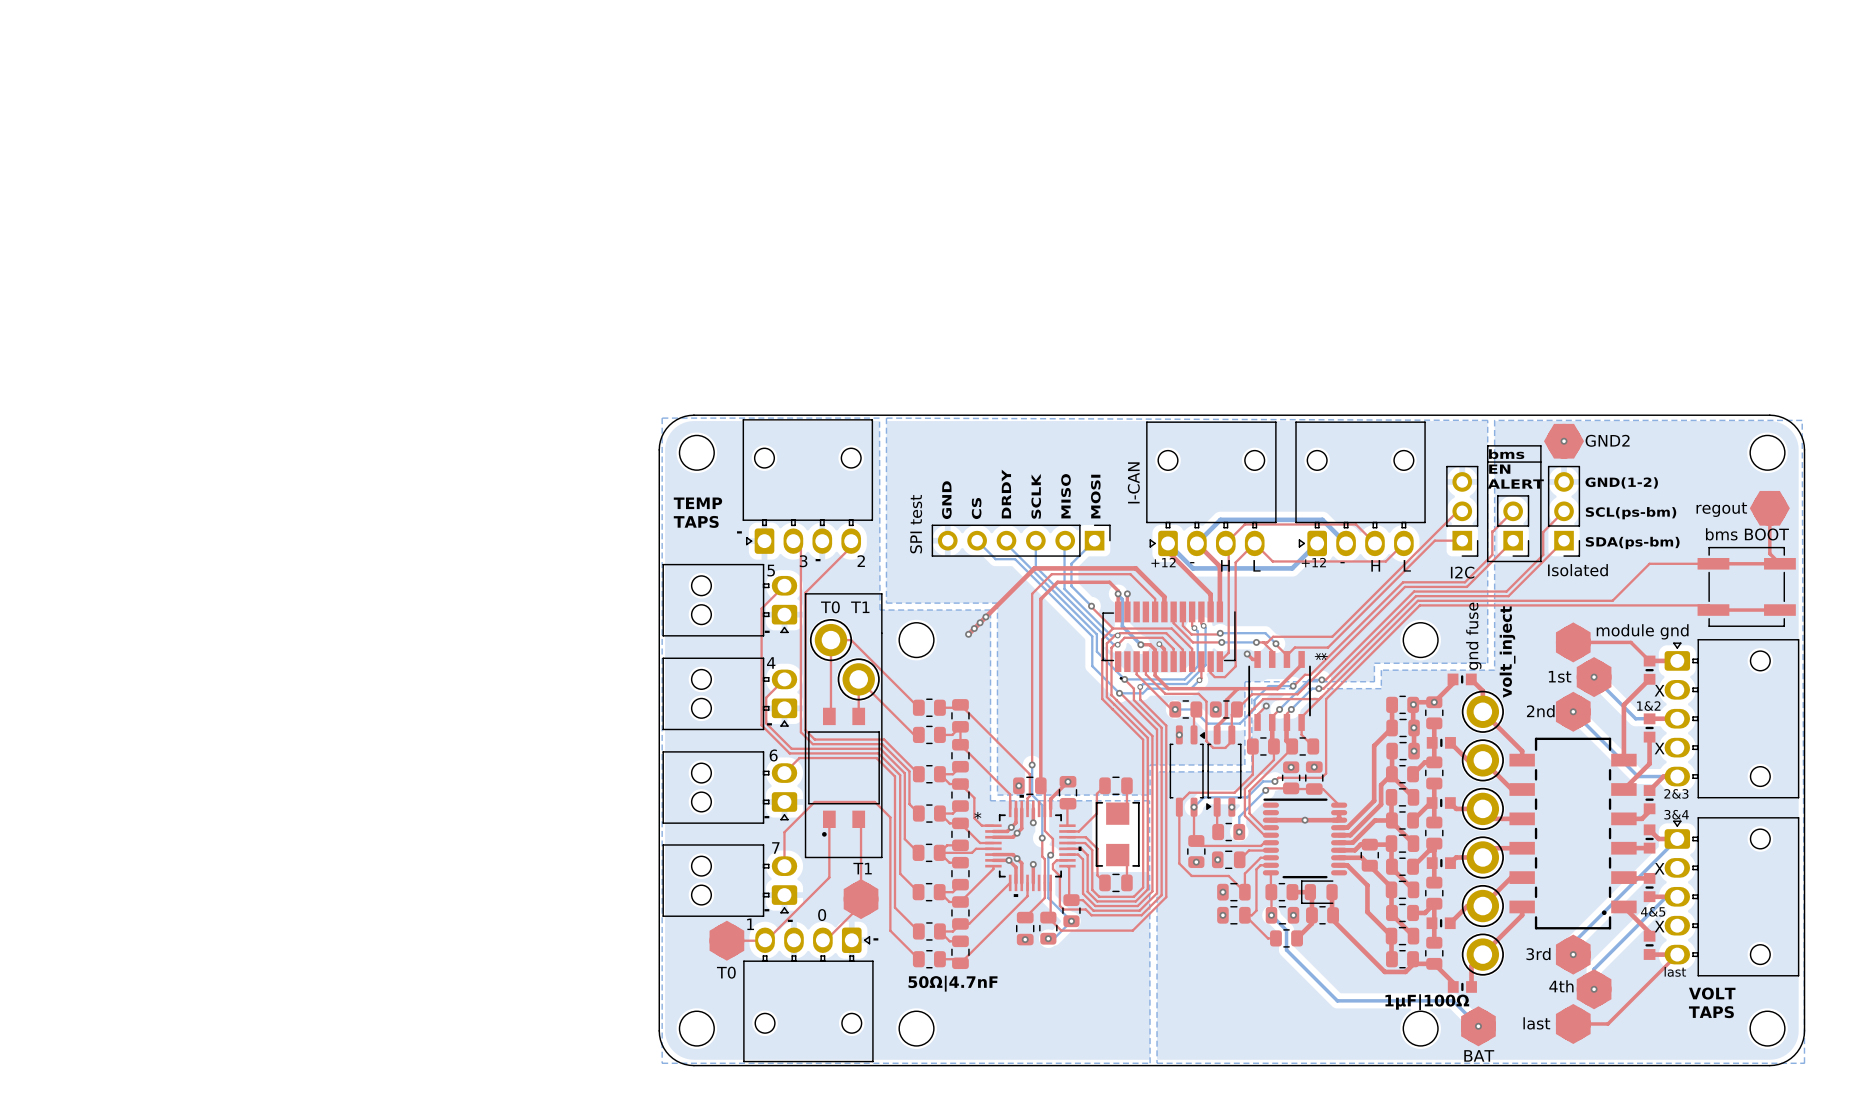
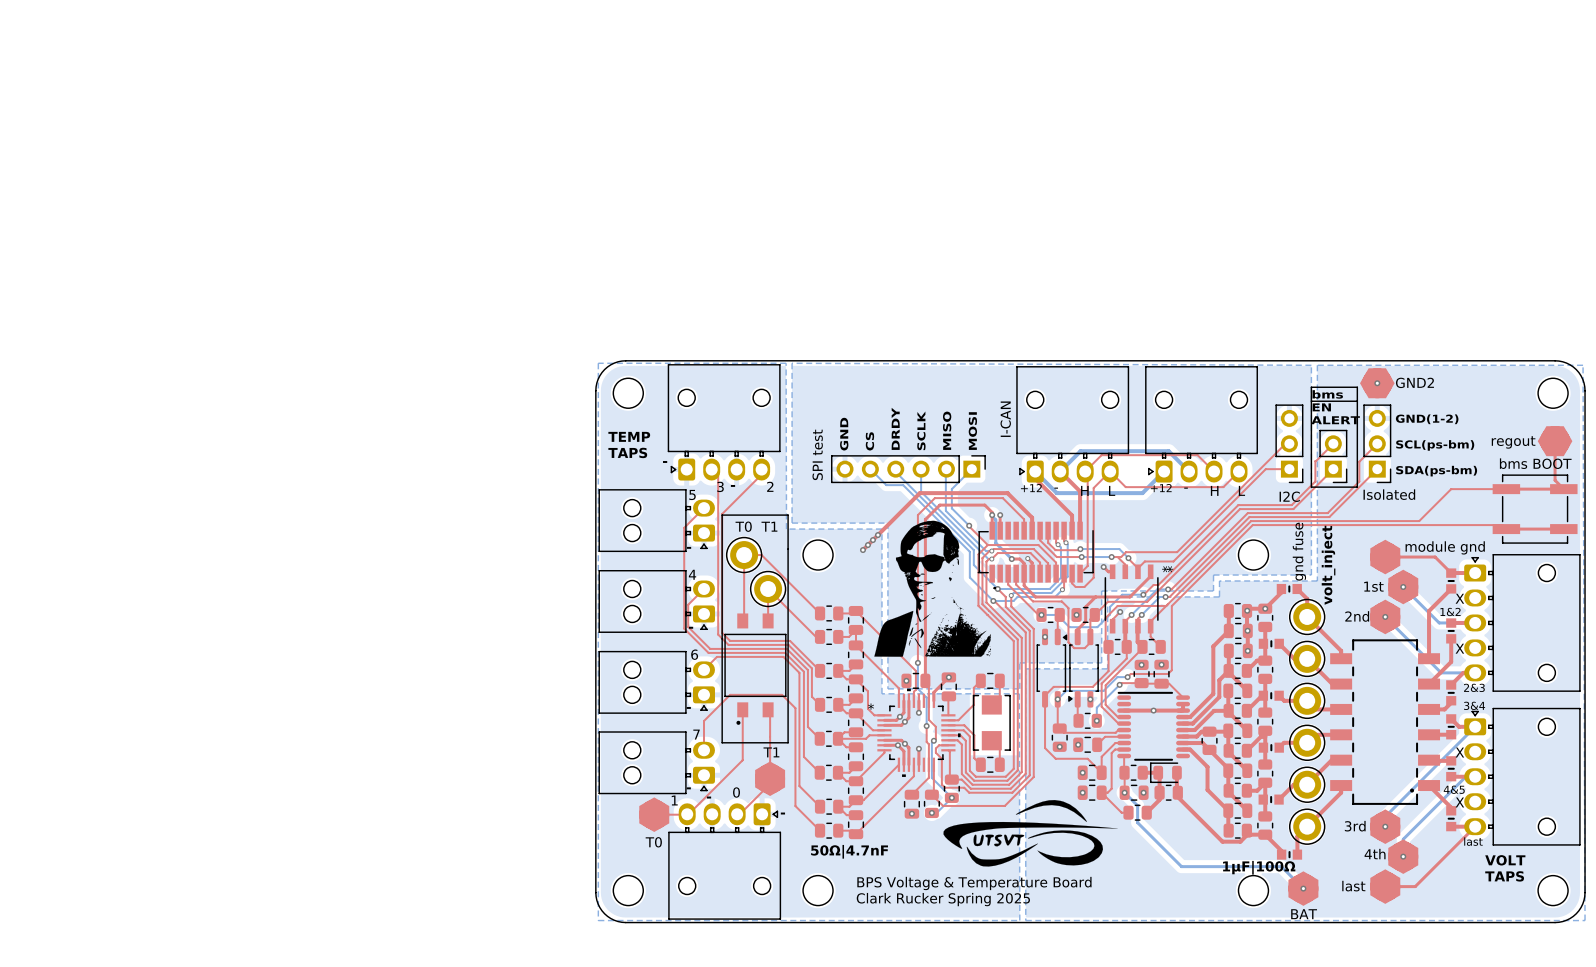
drawing: none -> [874, 520, 992, 657]
drawing: none -> [943, 800, 1118, 867]
text: none -> BPS Voltage & Temperature Board (974, 883)
text: none -> Clark Rucker Spring 2025 (943, 899)

